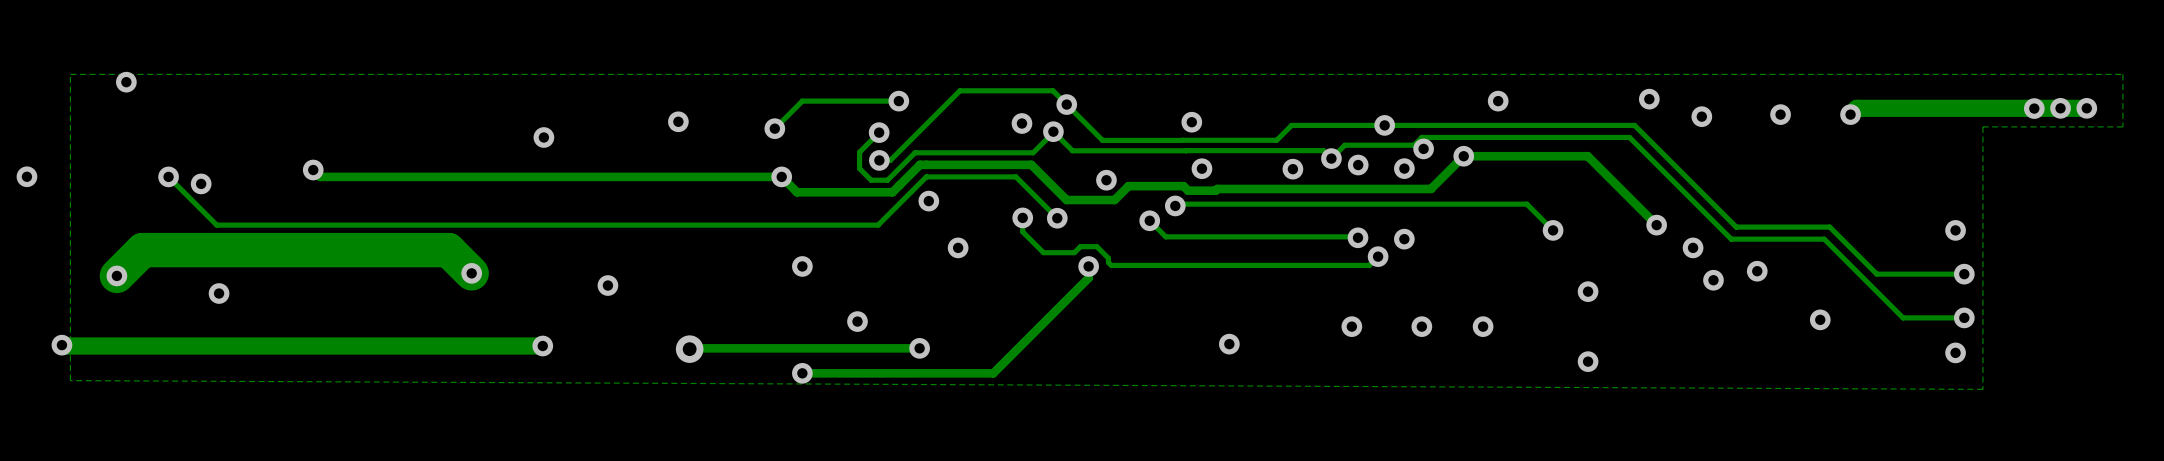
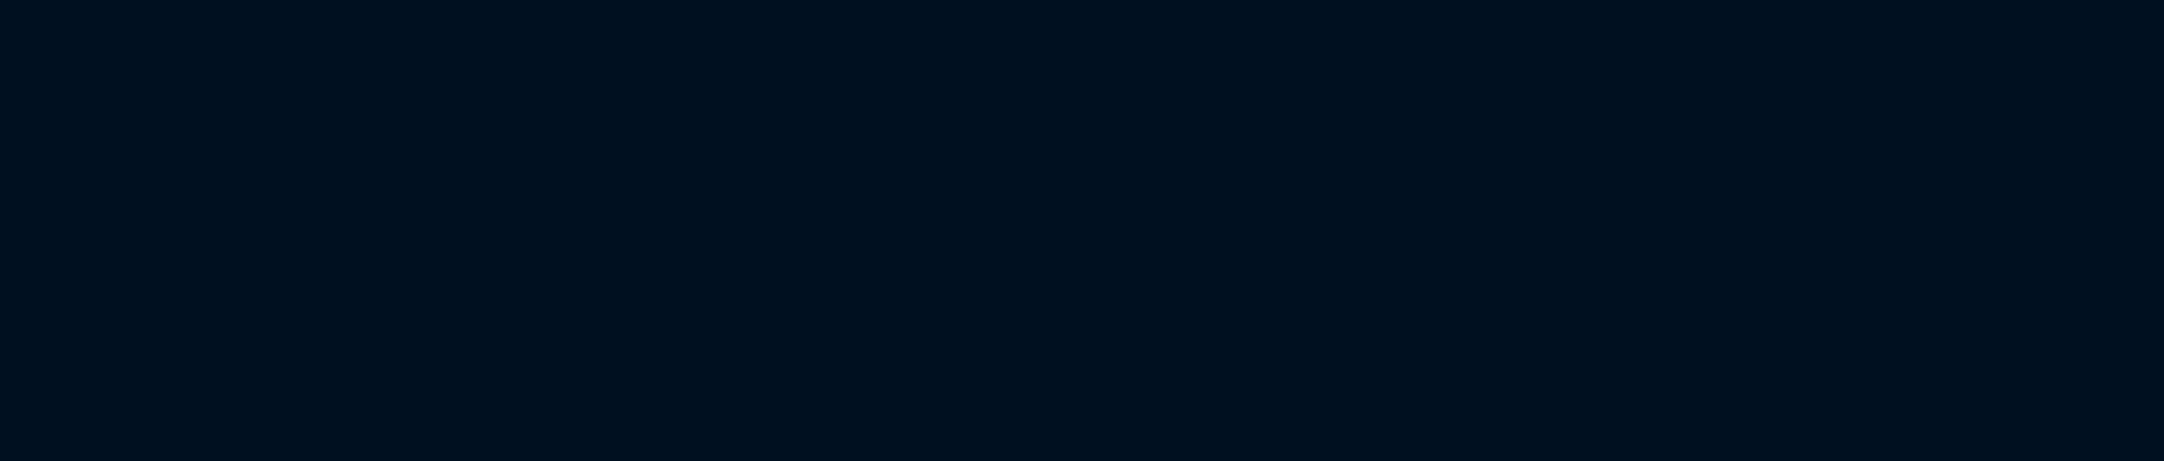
zone outline: (2122, 74) (2122, 126) (1982, 126) (1982, 389) (70, 380) (70, 74) (2122, 74) -> none
via: (126, 82) -> none
via: (1649, 99) -> none
track: (898, 101) (802, 101) (774, 128) -> none
via: (898, 101) -> none
via: (1498, 101) -> none
via: (1066, 104) -> none
via: (2034, 108) -> none
via: (2060, 108) -> none
track: (2086, 108) (1856, 108) (1850, 114) -> none
via: (2086, 108) -> none
via: (1780, 114) -> none
via: (1850, 114) -> none
via: (1701, 116) -> none
via: (678, 121) -> none
via: (1191, 122) -> none
via: (1021, 123) -> none
via: (1384, 125) -> none
via: (774, 128) -> none
via: (1053, 131) -> none
track: (879, 132) (859, 152) (859, 168) (871, 180) (887, 180) (915, 152) (1033, 152) (1053, 131) (1072, 150) (1323, 150) (1331, 158) (1344, 145) (1414, 145) (1421, 137) (1629, 137) (1731, 239) (1824, 239) (1903, 317) (1964, 317) -> none
via: (879, 132) -> none
via: (543, 137) -> none
via: (1423, 148) -> none
via: (1463, 156) -> none
via: (1331, 158) -> none
track: (879, 160) (890, 160) (959, 90) (1052, 90) (1102, 140) (1276, 140) (1291, 125) (1634, 125) (1736, 227) (1829, 227) (1876, 274) (1964, 274) -> none
via: (879, 160) -> none
via: (1358, 165) -> none
via: (1201, 168) -> none
via: (1404, 168) -> none
via: (1292, 169) -> none
track: (313, 170) (320, 176) (781, 176) (797, 192) (892, 192) (920, 164) (1031, 164) (1066, 200) (1114, 200) (1128, 186) (1183, 186) (1188, 190) (1215, 190) (1217, 188) (1431, 188) (1463, 156) (1587, 156) (1656, 225) -> none
via: (313, 170) -> none
via: (26, 176) -> none
track: (168, 176) (216, 225) (878, 225) (926, 176) (1015, 176) (1057, 218) -> none
via: (168, 176) -> none
via: (781, 176) -> none
via: (1106, 180) -> none
via: (201, 183) -> none
via: (928, 201) -> none
track: (1175, 205) (1177, 204) (1526, 204) (1553, 230) -> none
via: (1175, 205) -> none
track: (1022, 217) (1022, 231) (1043, 252) (1074, 252) (1080, 246) (1096, 246) (1108, 258) (1108, 262) (1111, 265) (1369, 265) (1378, 256) -> none
via: (1022, 217) -> none
via: (1057, 218) -> none
track: (1149, 220) (1165, 236) (1358, 237) -> none
via: (1149, 220) -> none
via: (1656, 225) -> none
via: (1553, 230) -> none
via: (1955, 230) -> none
via: (1358, 237) -> none
via: (1404, 239) -> none
via: (958, 247) -> none
via: (1693, 247) -> none
via: (1378, 256) -> none
via: (802, 266) -> none
track: (1088, 266) (1088, 278) (993, 373) (802, 373) -> none
via: (1088, 266) -> none
via: (1757, 271) -> none
track: (471, 273) (448, 250) (142, 250) (116, 275) -> none
via: (471, 273) -> none
via: (1964, 274) -> none
via: (116, 275) -> none
via: (1713, 280) -> none
via: (607, 285) -> none
via: (1588, 291) -> none
via: (219, 293) -> none
via: (1964, 317) -> none
via: (1820, 319) -> none
via: (857, 321) -> none
via: (1351, 326) -> none
via: (1421, 326) -> none
via: (1483, 326) -> none
via: (1229, 344) -> none
track: (61, 345) (542, 346) -> none
via: (61, 345) -> none
via: (542, 346) -> none
track: (919, 348) (689, 349) -> none
via: (919, 348) -> none
via: (689, 349) -> none
via: (1955, 352) -> none
via: (1588, 361) -> none
via: (802, 373) -> none

